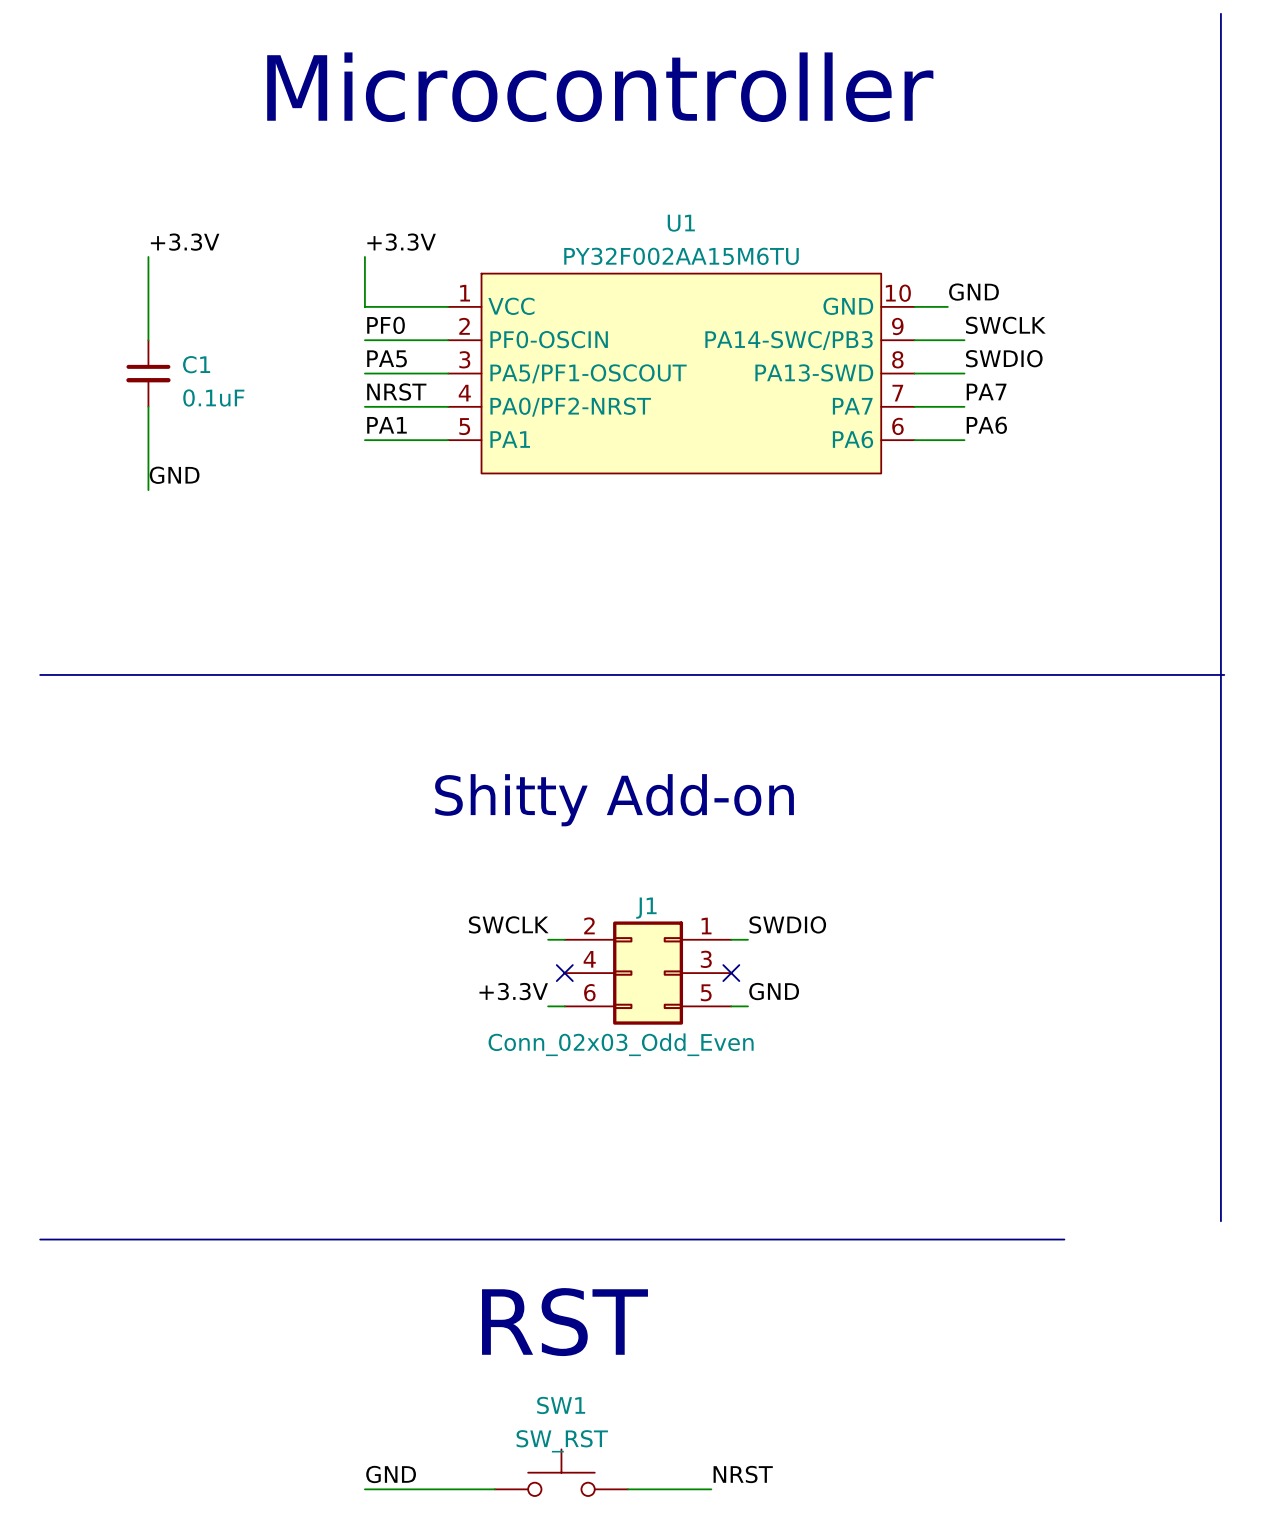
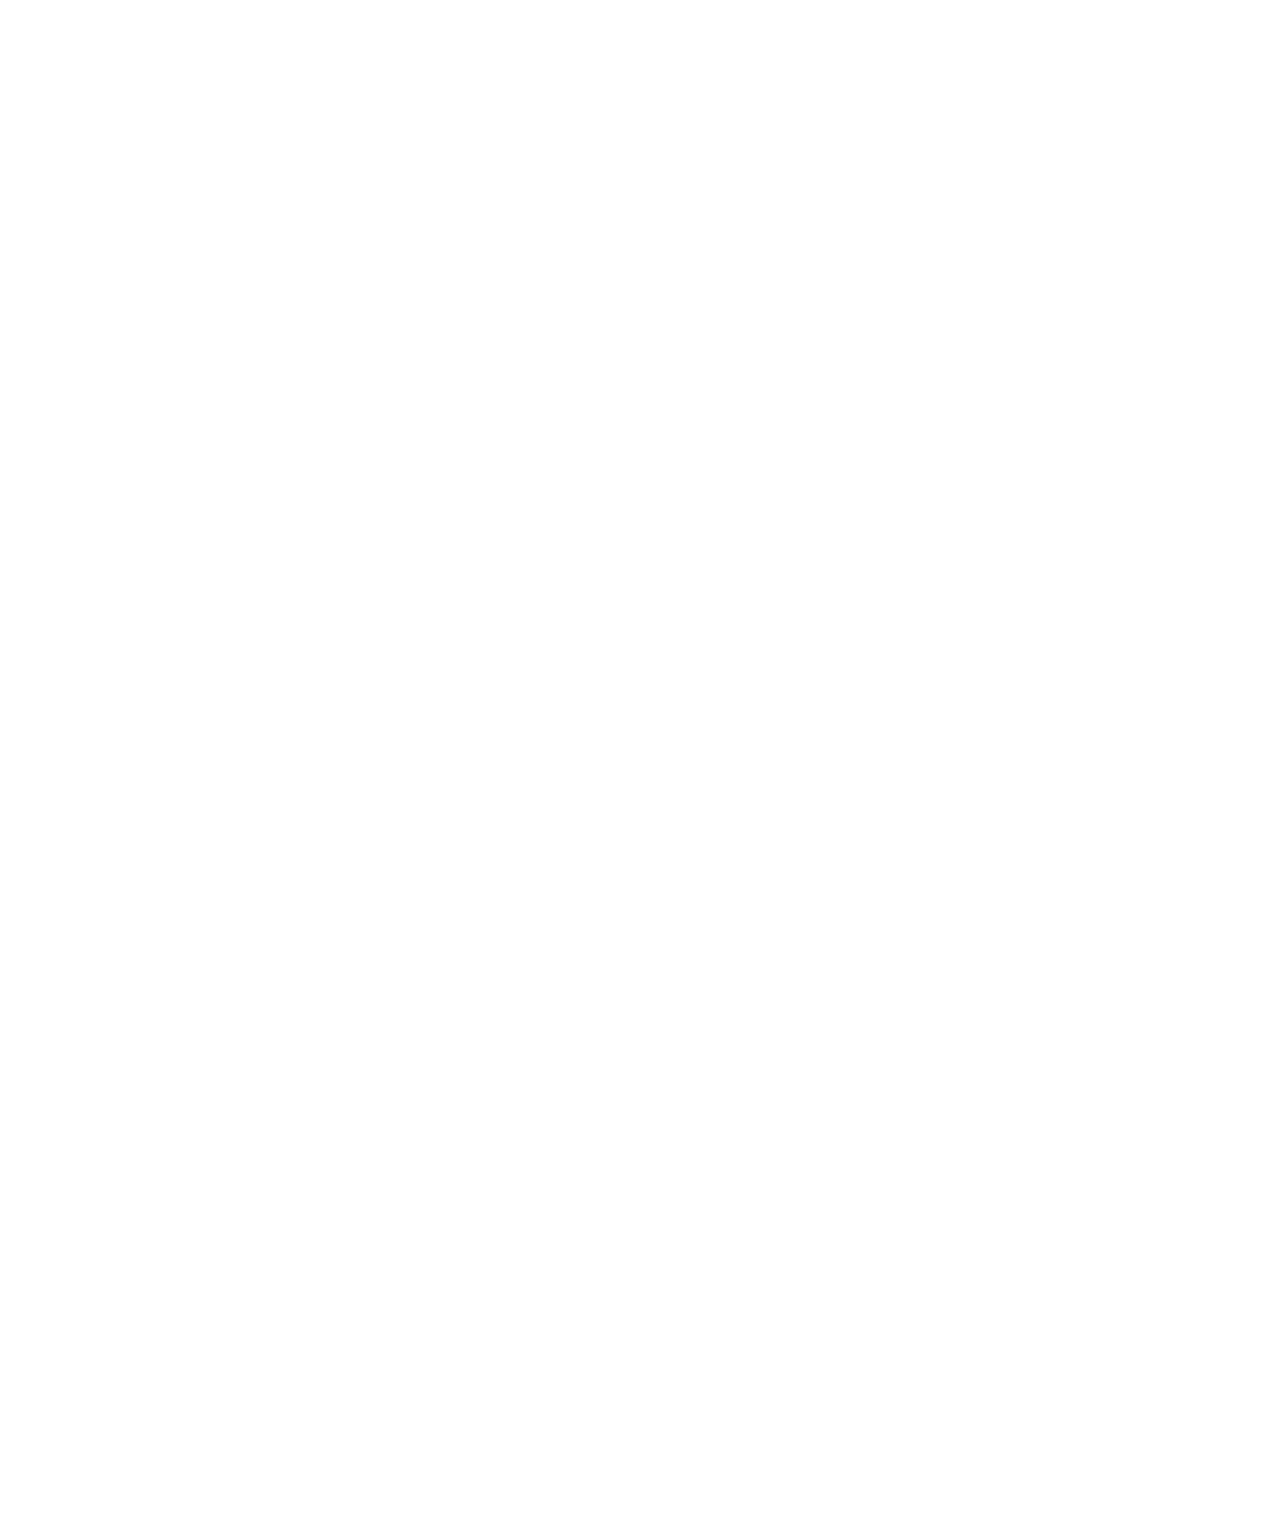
line: (1220, 13) (1220, 1221) -> none
text: Microcontroller (600, 87) -> none
label: +3.3V (185, 242) -> none
label: +3.3V (401, 242) -> none
wire: (148, 256) (148, 340) -> none
wire: (364, 256) (364, 306) (448, 306) -> none
label: GND (973, 292) -> none
wire: (914, 306) (947, 306) -> none
label: PF0 (386, 325) -> none
label: SWCLK (1005, 325) -> none
wire: (364, 340) (448, 340) -> none
wire: (914, 340) (964, 340) -> none
label: PA5 (387, 358) -> none
label: SWDIO (1004, 358) -> none
C1: 0.1uF (148, 373) -> none
wire: (364, 373) (448, 373) -> none
U1: PY32F002AA15M6TU (681, 373) -> none
wire: (914, 373) (964, 373) -> none
label: NRST (396, 391) -> none
label: PA7 (986, 391) -> none
wire: (148, 406) (148, 490) -> none
wire: (364, 406) (448, 406) -> none
wire: (914, 406) (964, 406) -> none
label: PA1 (386, 425) -> none
label: PA6 (986, 425) -> none
wire: (364, 440) (448, 440) -> none
wire: (914, 440) (964, 440) -> none
label: GND (174, 475) -> none
line: (40, 674) (1224, 674) -> none
text: Shitty Add-on (614, 800) -> none
label: SWCLK (508, 924) -> none
label: SWDIO (787, 924) -> none
wire: (548, 939) (564, 939) -> none
wire: (731, 939) (747, 939) -> none
no-connect mark: (564, 973) -> none
J1: Conn_02x03_Odd_Even (648, 973) -> none
no-connect mark: (731, 973) -> none
label: +3.3V (513, 991) -> none
label: GND (774, 991) -> none
wire: (548, 1006) (564, 1006) -> none
wire: (731, 1006) (747, 1006) -> none
line: (40, 1239) (1064, 1239) -> none
text: RST (564, 1322) -> none
SW1: SW_RST (561, 1472) -> none
label: GND (391, 1474) -> none
label: NRST (743, 1474) -> none
wire: (364, 1489) (494, 1489) -> none
wire: (628, 1489) (711, 1489) -> none

